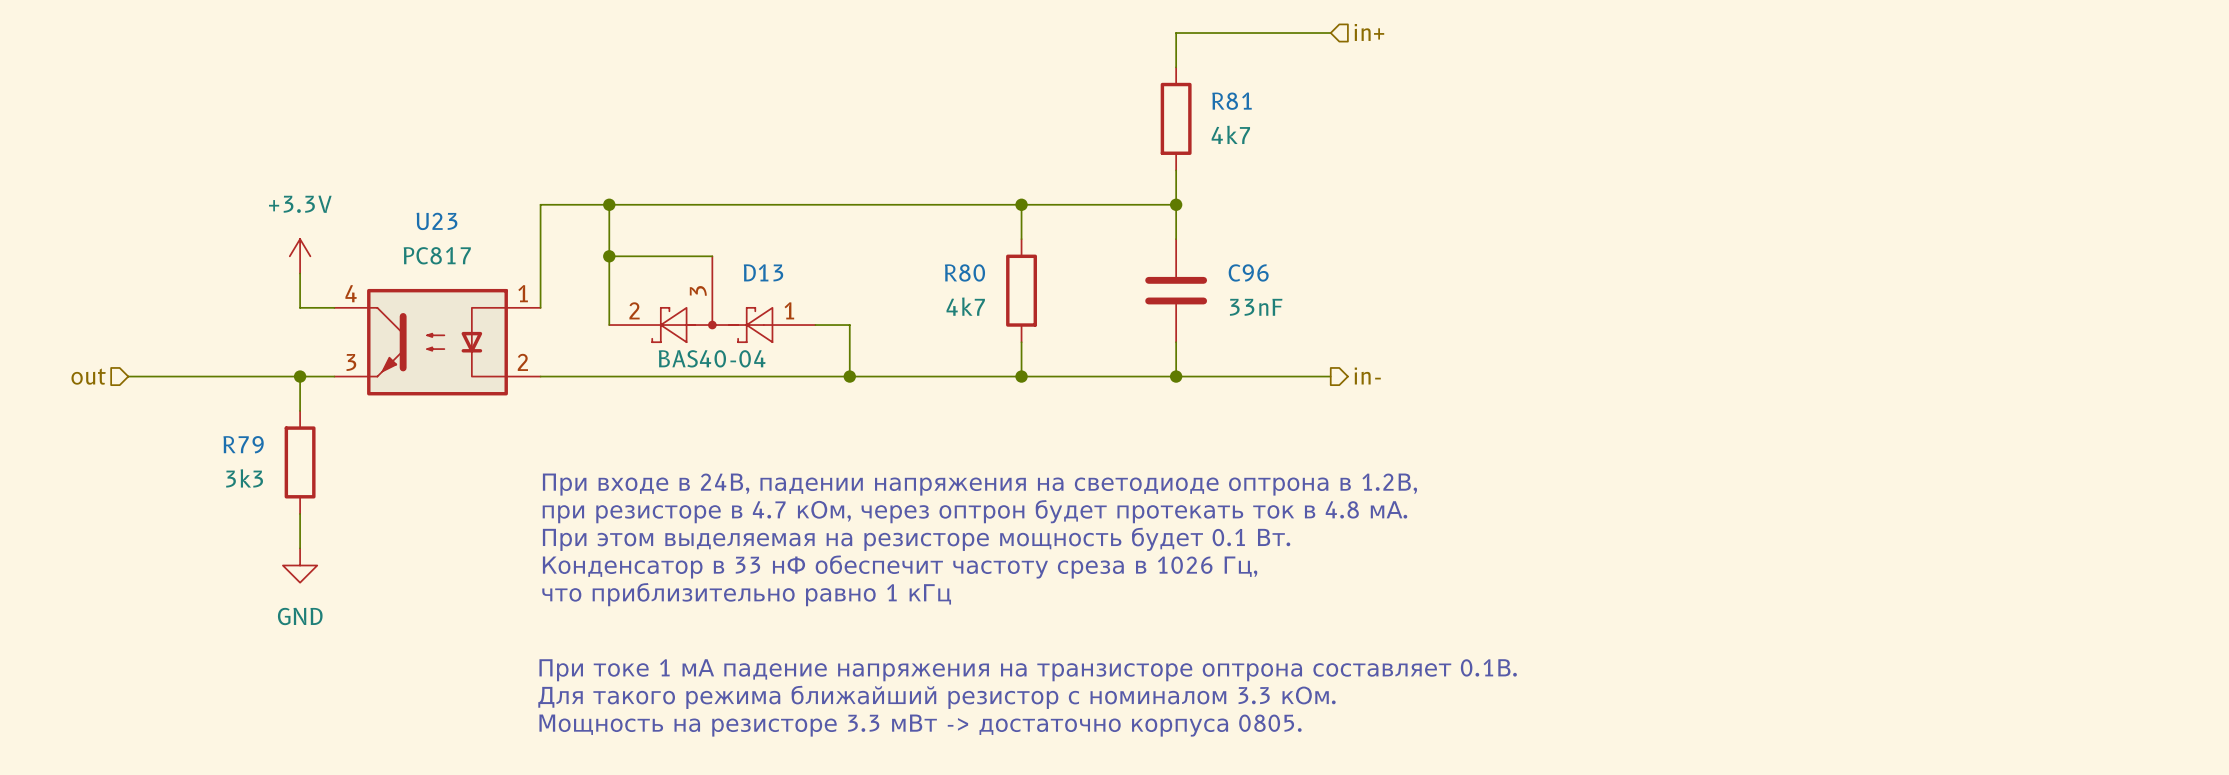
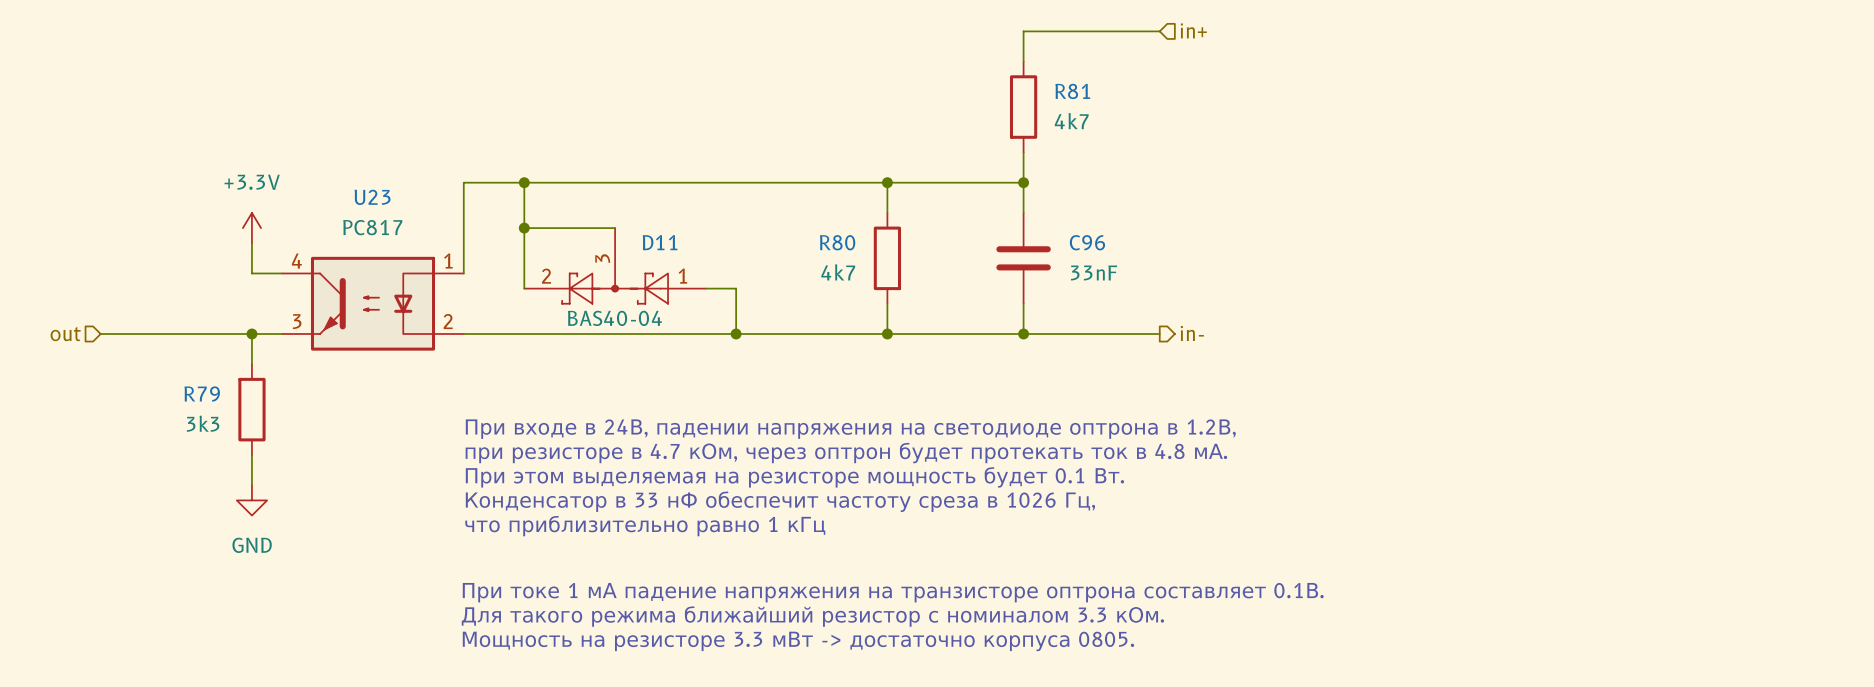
D13 name: D13 (763, 272) -> D11 (660, 242)

